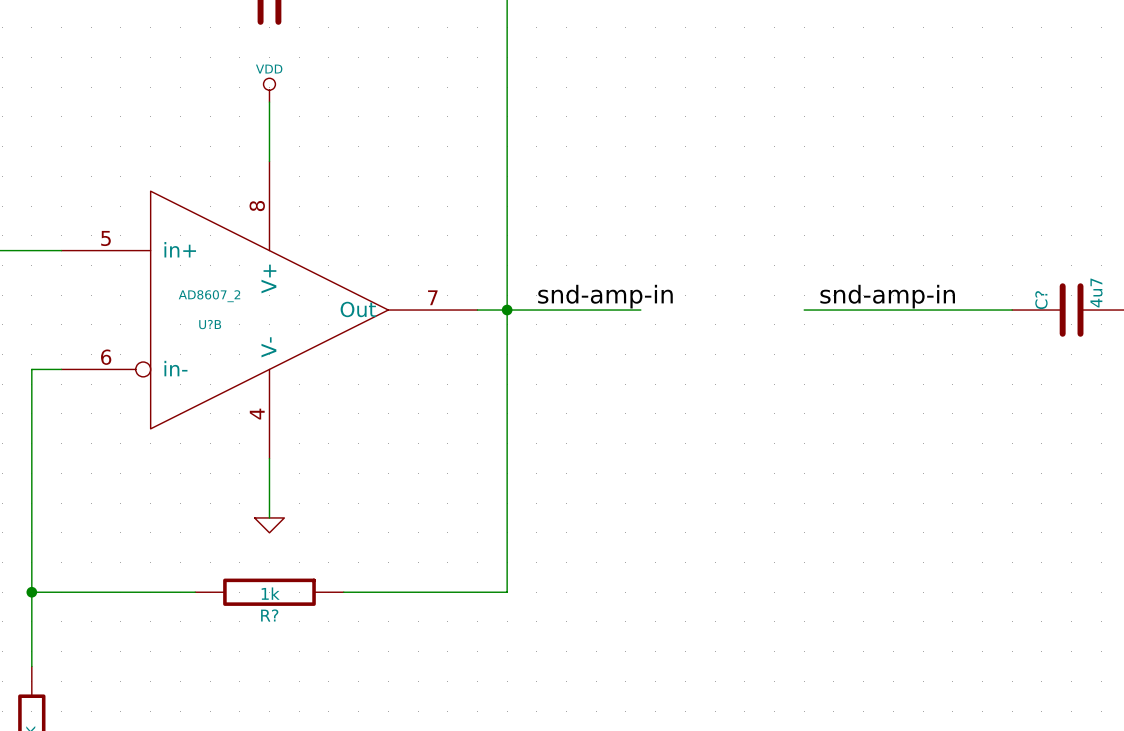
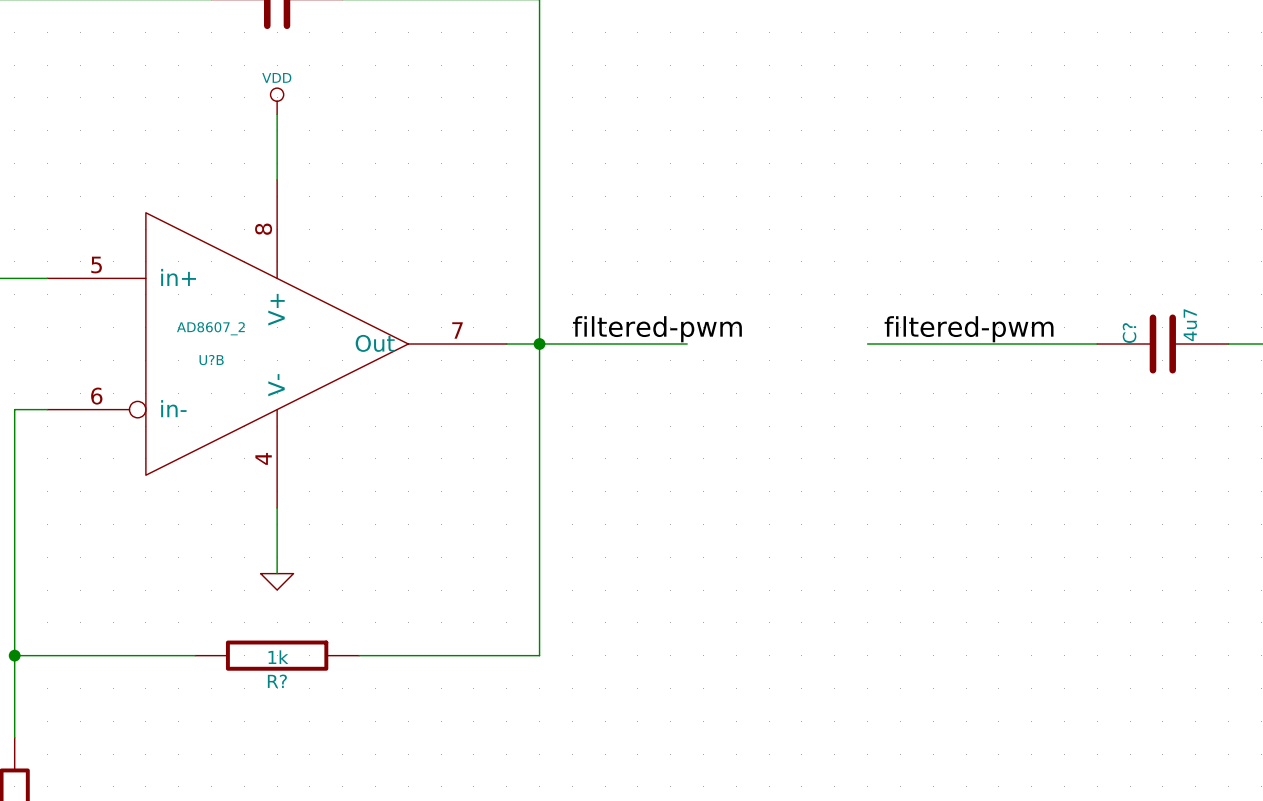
label: snd-amp-in (605, 296) -> filtered-pwm (657, 329)
label: snd-amp-in (887, 296) -> filtered-pwm (969, 329)

